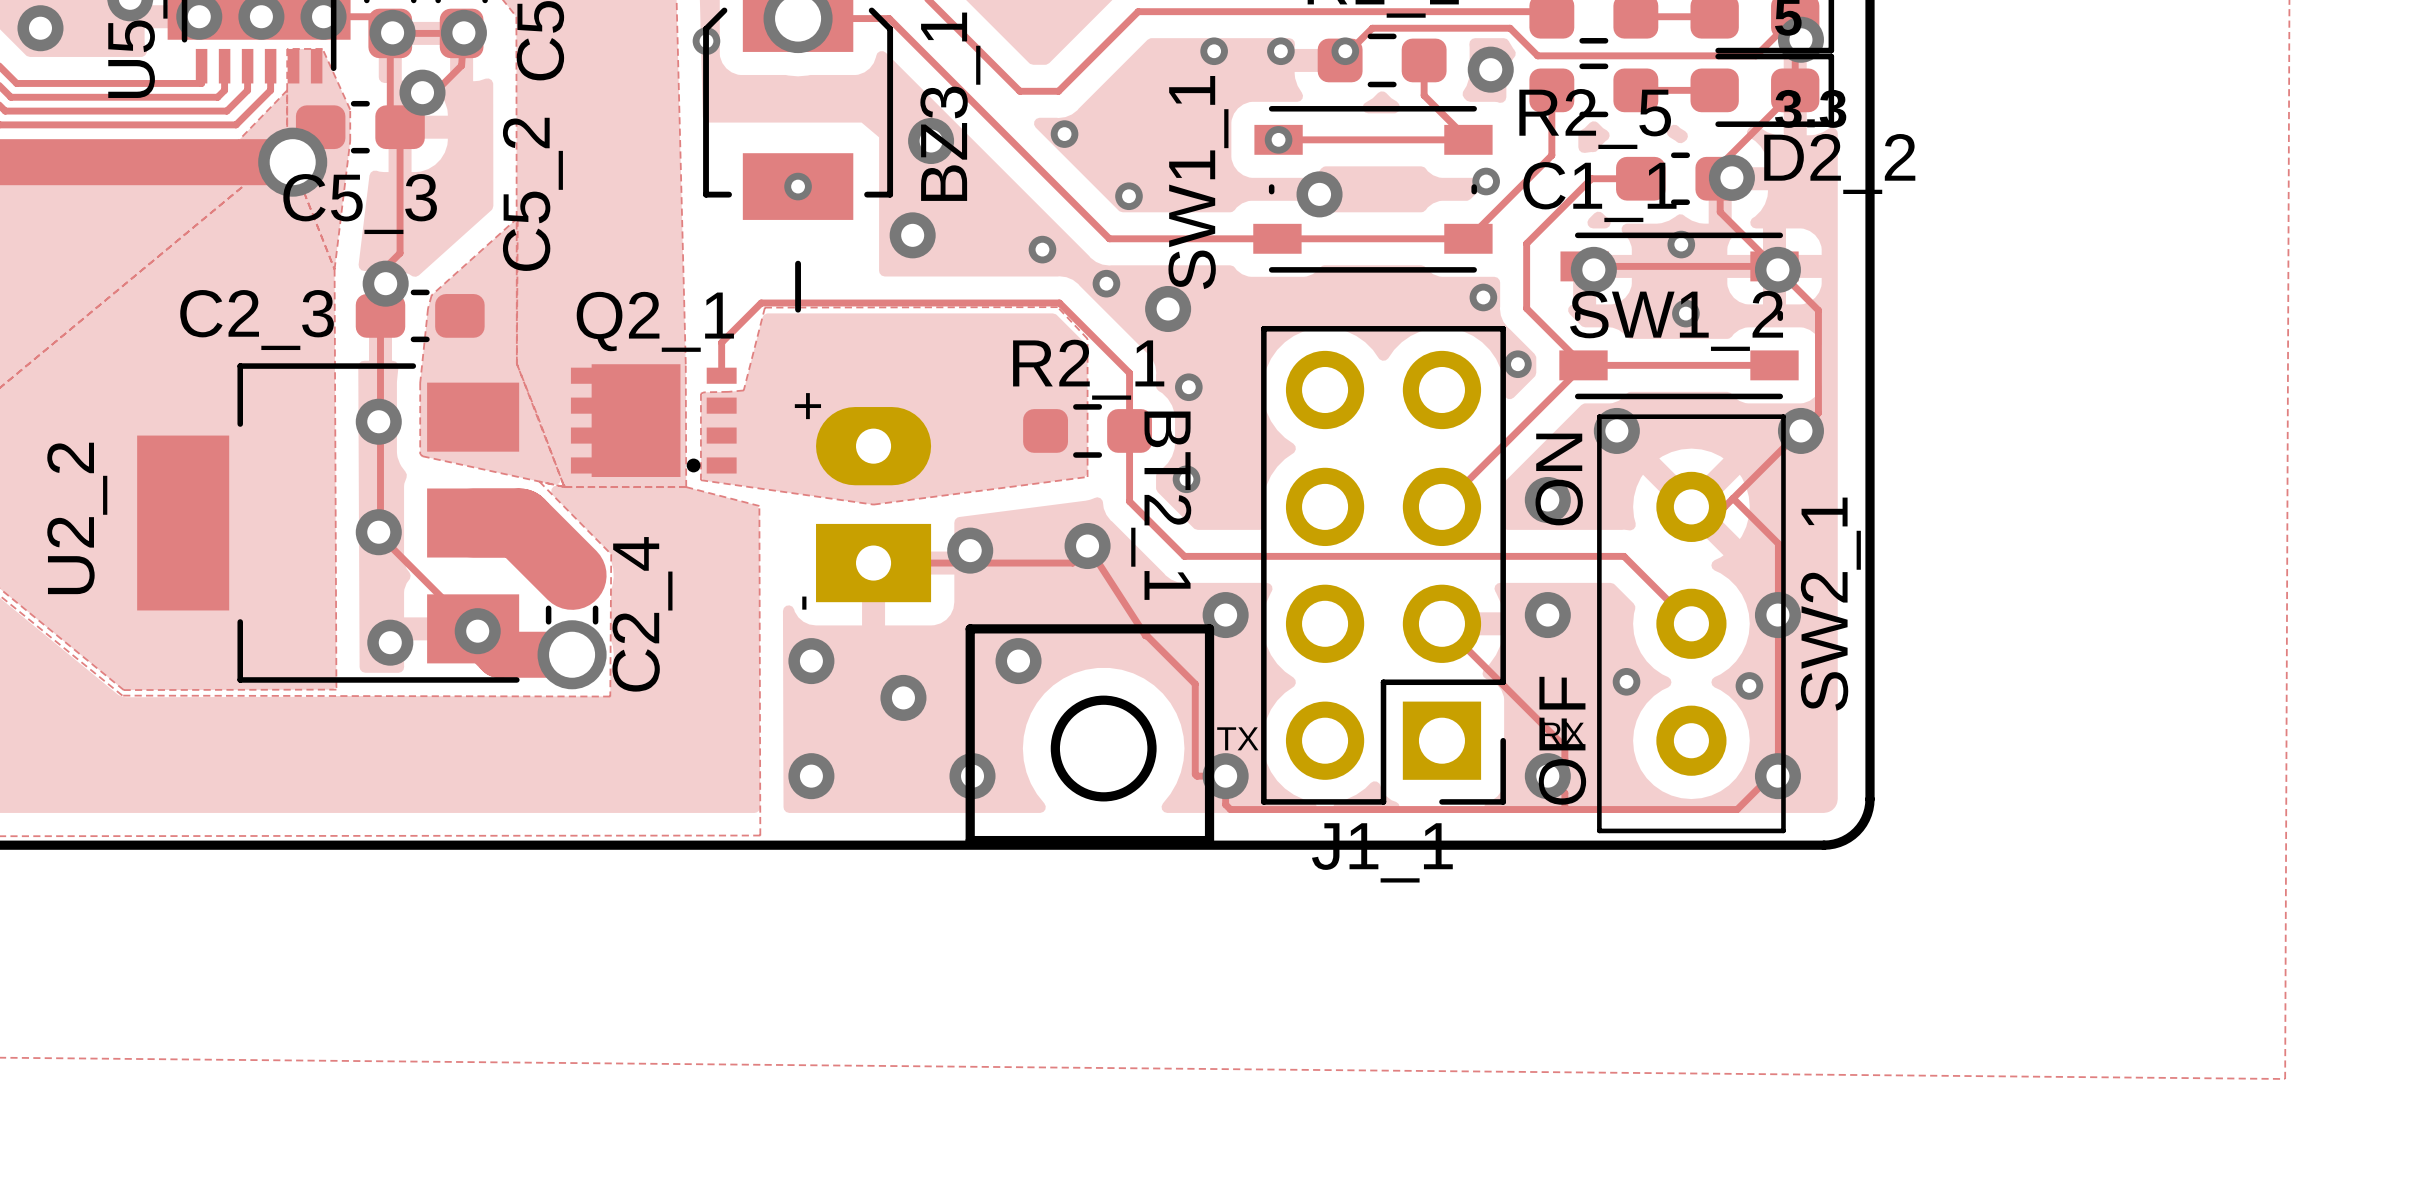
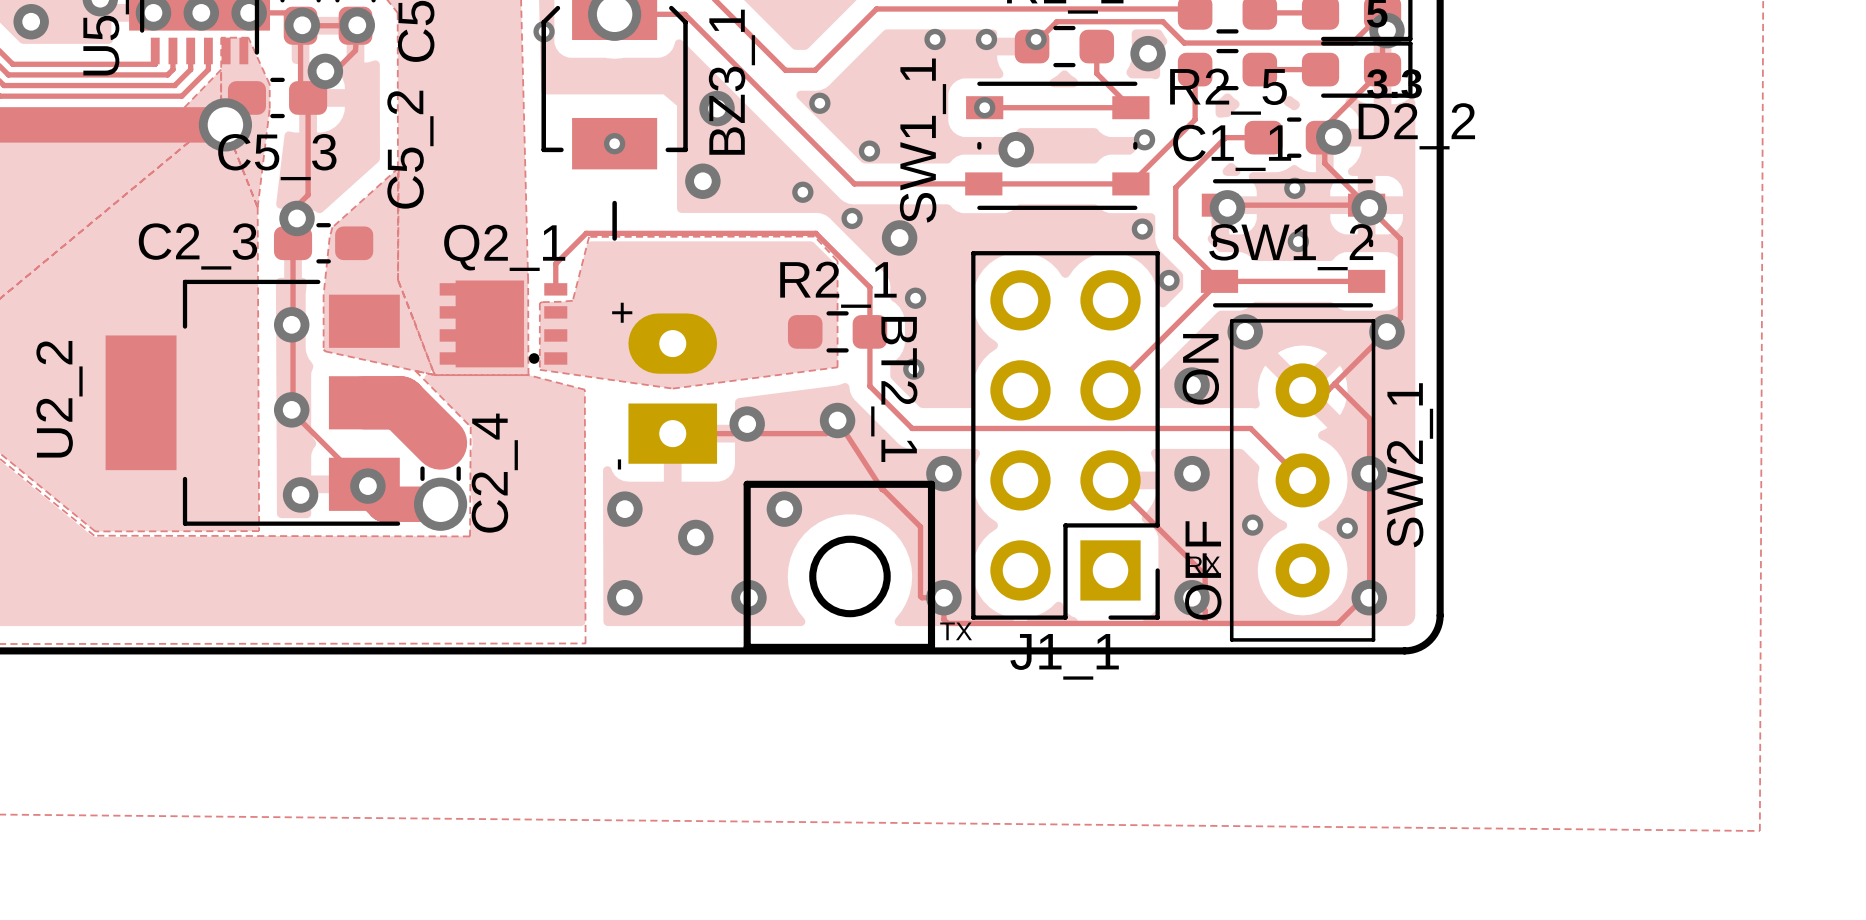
text position: TX (1237, 738) -> TX (956, 631)

